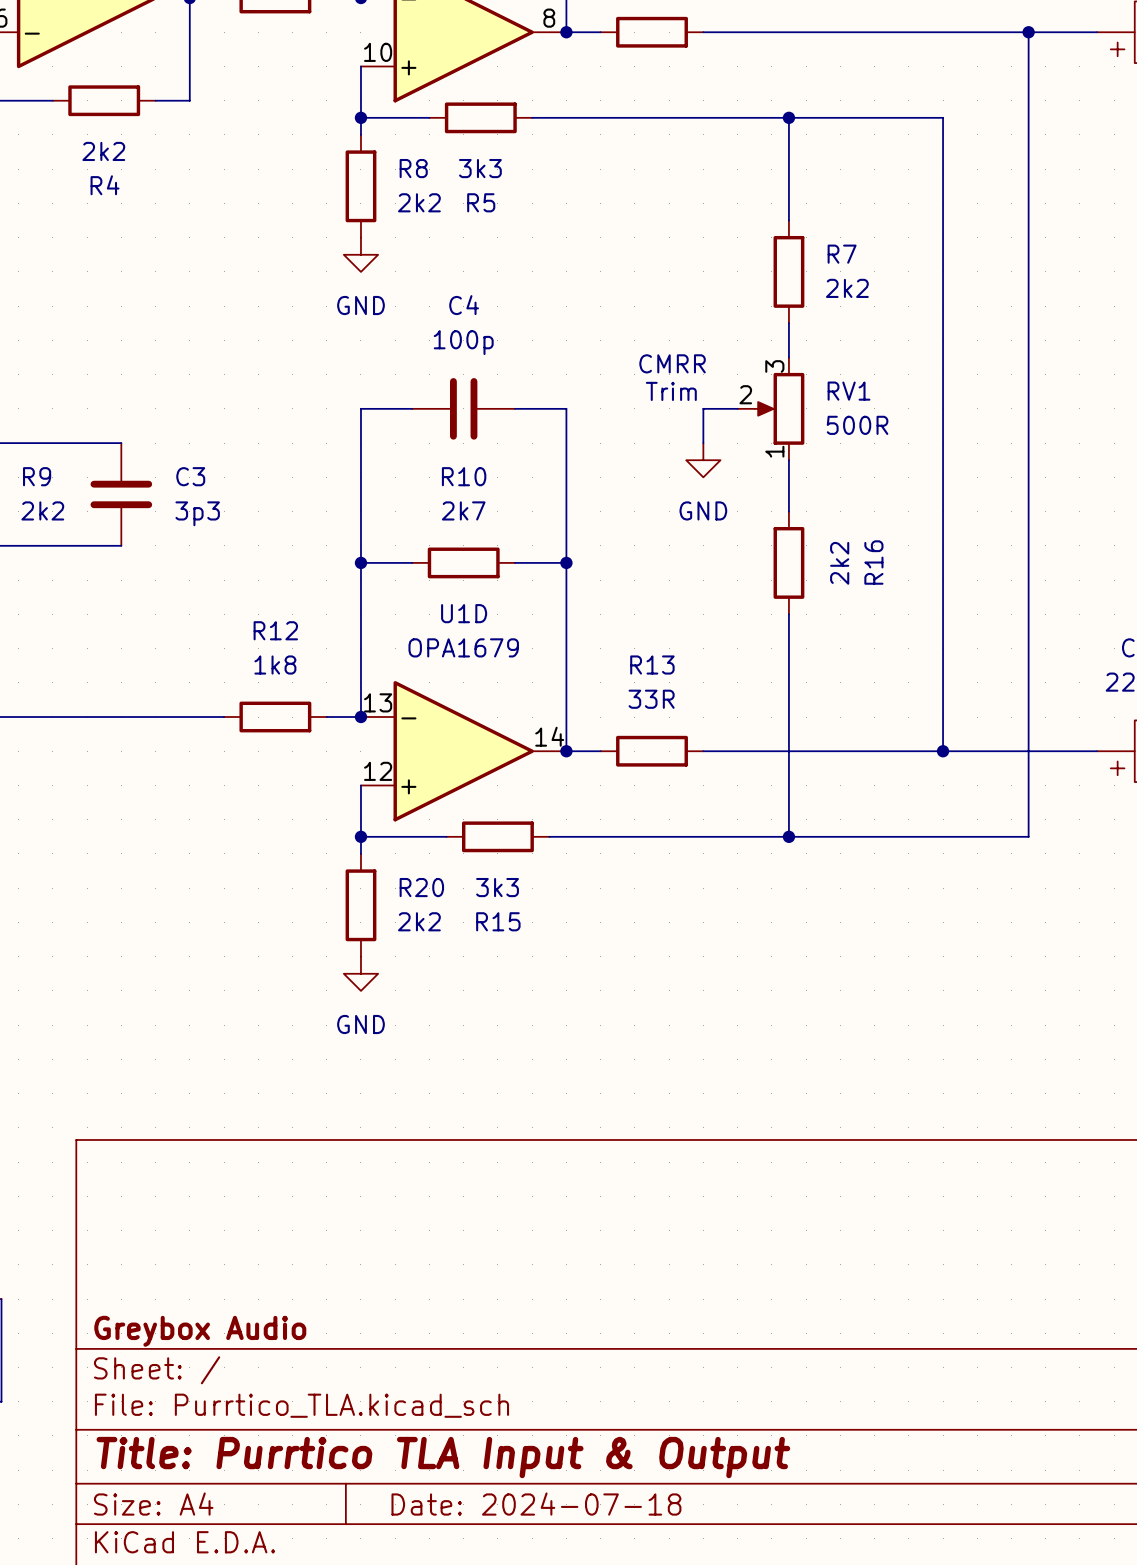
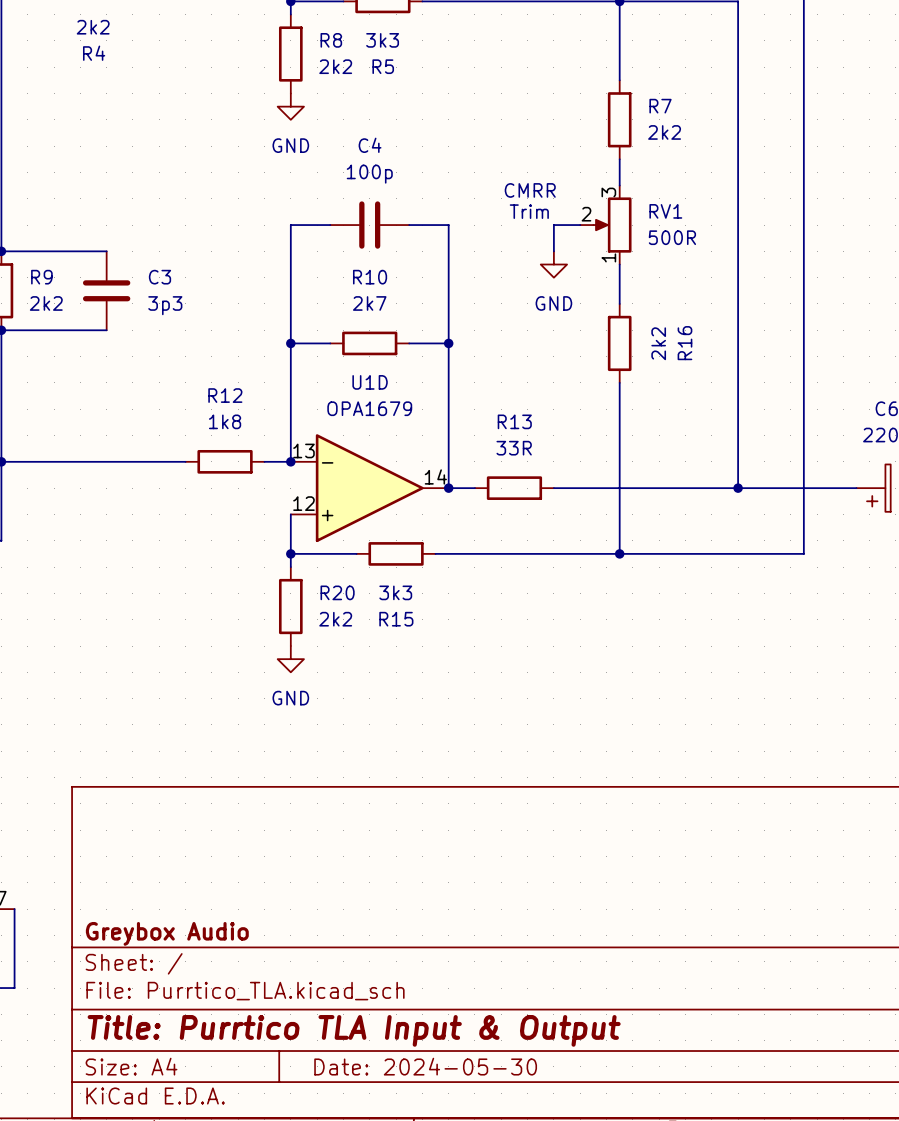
title block: Date: 2024-07-18 (536, 1504) -> Date: 2024-05-30 (425, 1066)

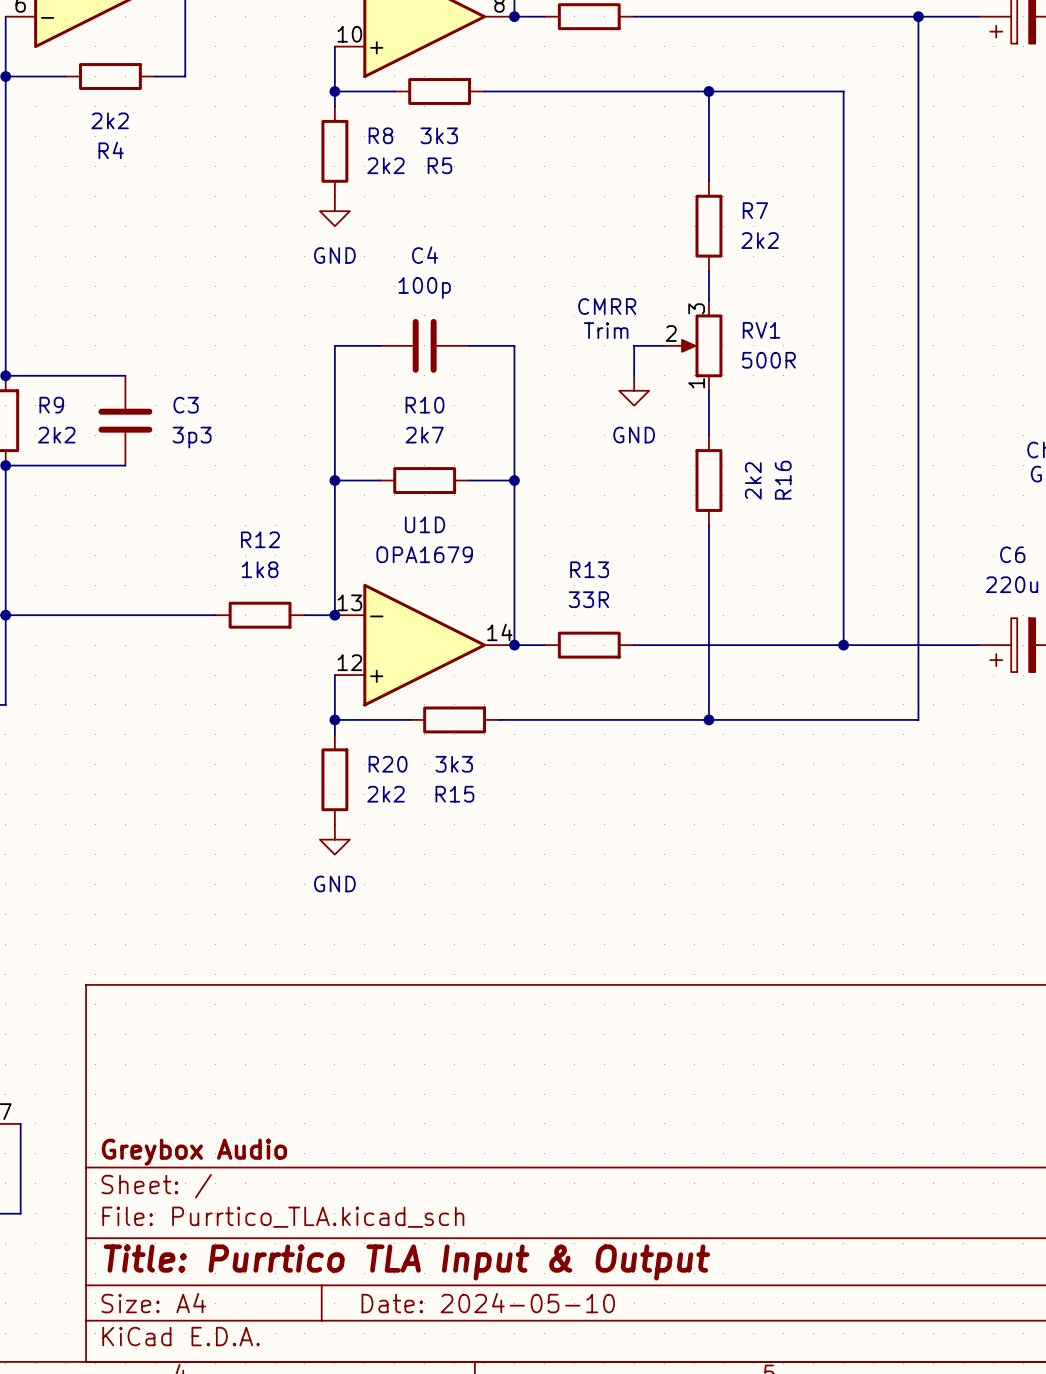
title block: Date: 2024-05-30 (425, 1066) -> Date: 2024-05-10 (488, 1303)

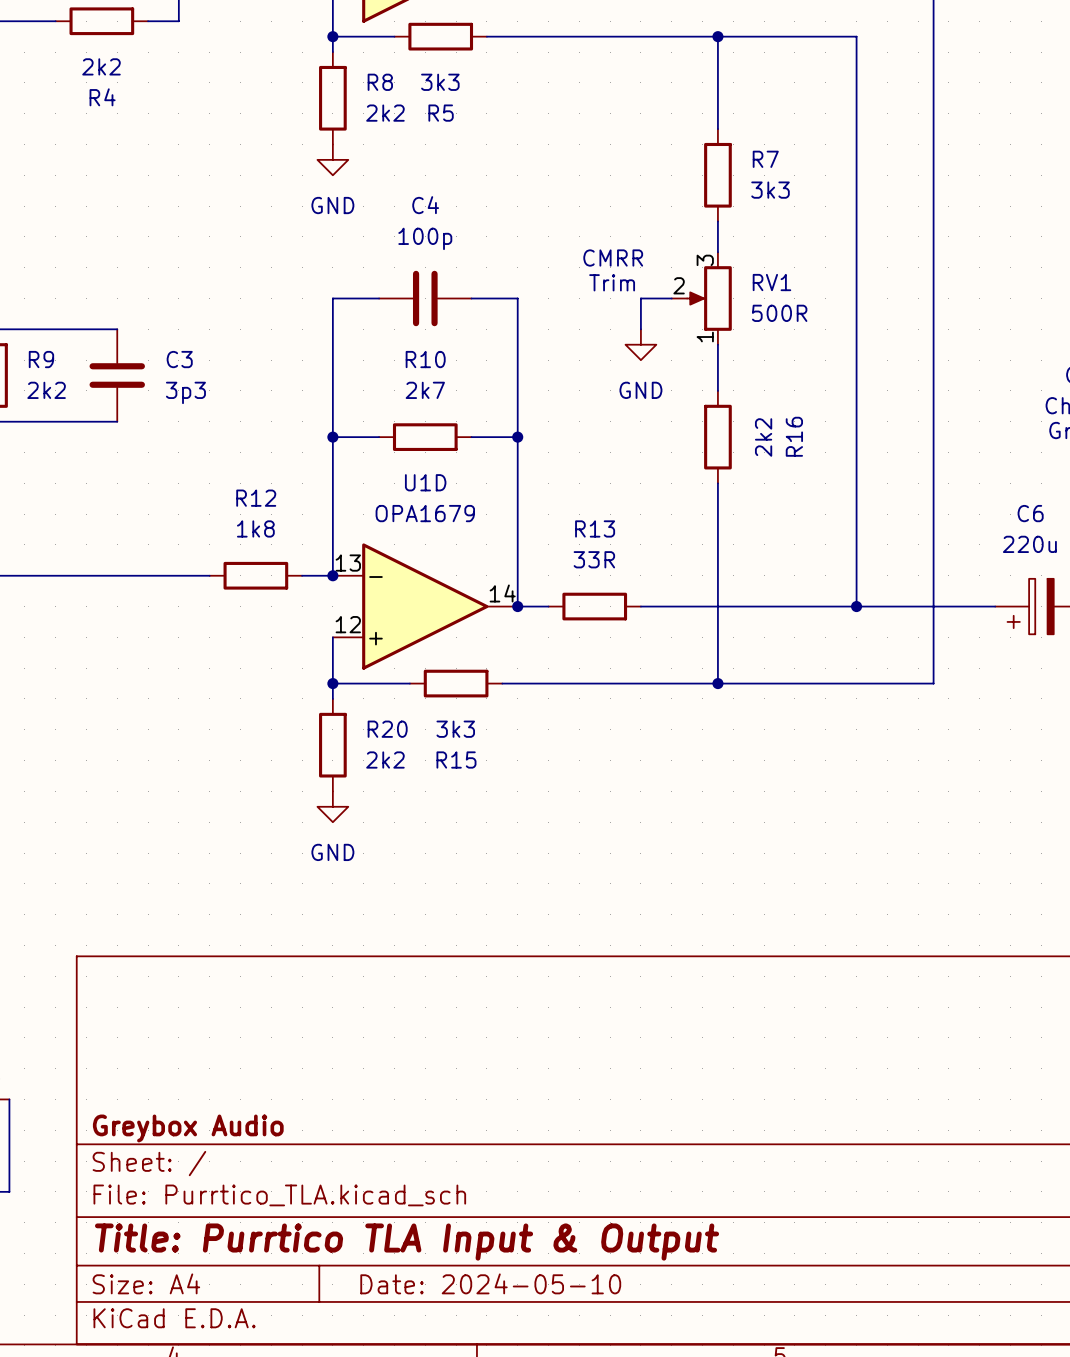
R7 value: 2k2 (760, 240) -> 3k3 (770, 190)

